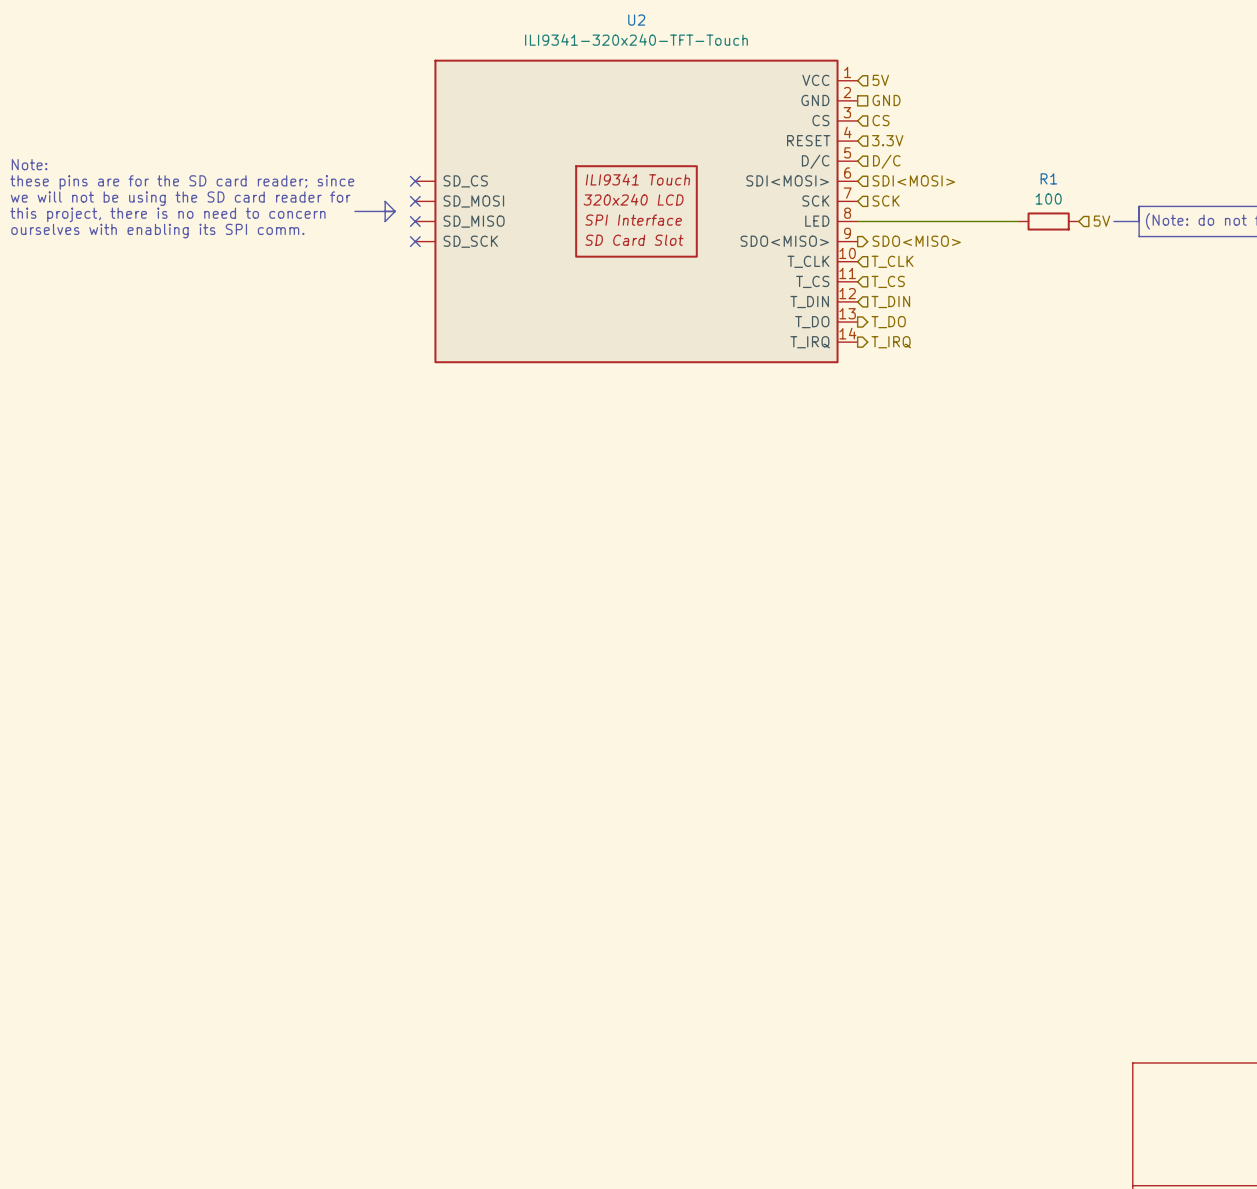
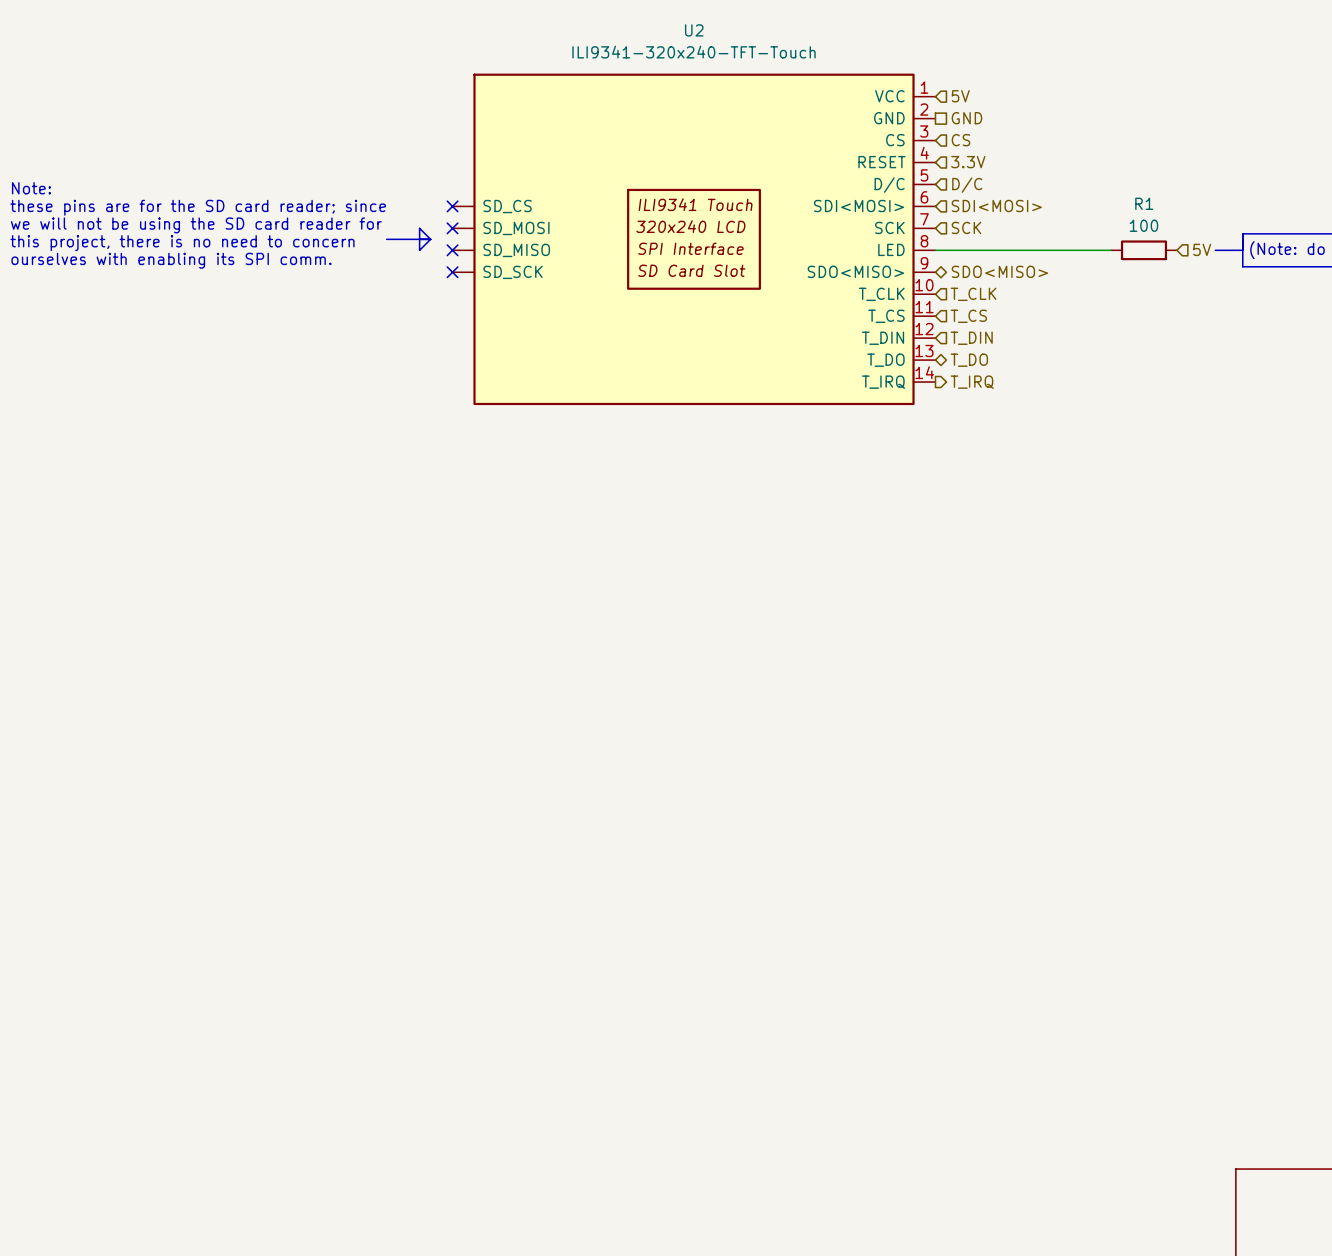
hierarchical label shape: output (916, 241) -> bidirectional (999, 271)
hierarchical label shape: output (888, 322) -> bidirectional (969, 360)

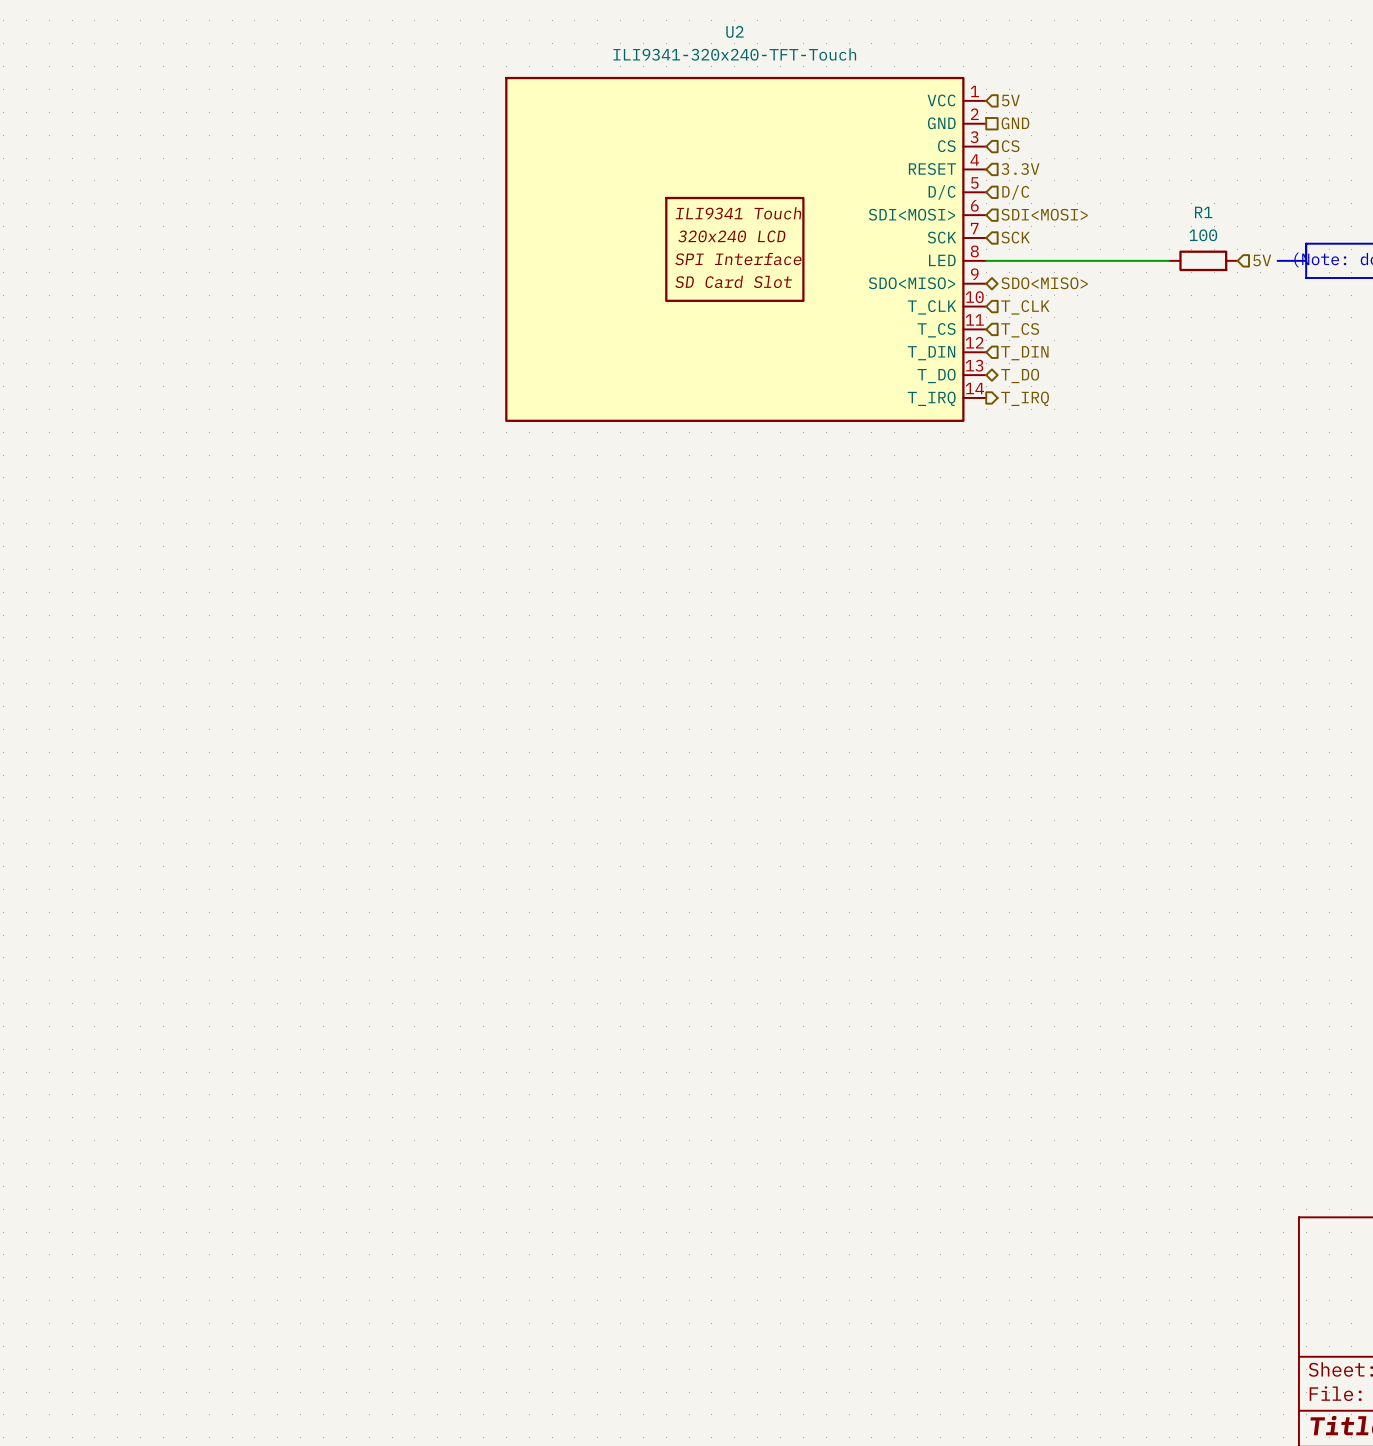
U2 symbol: [452, 73, 936, 406] -> [505, 76, 987, 422]
text: Note: (31, 188) -> none
no-connect mark: (452, 206) -> none
text: these pins are for the SD card reader; since (198, 207) -> none
text: we will not be using the SD card reader for (196, 225) -> none
no-connect mark: (452, 228) -> none
line: (386, 239) (430, 239) -> none
line: (430, 239) (419, 250) (419, 228) (430, 239) -> none
text: this project, there is no need to concern (182, 243) -> none
no-connect mark: (452, 250) -> none
text: ourselves with enabling its SPI comm. (171, 260) -> none
no-connect mark: (452, 272) -> none

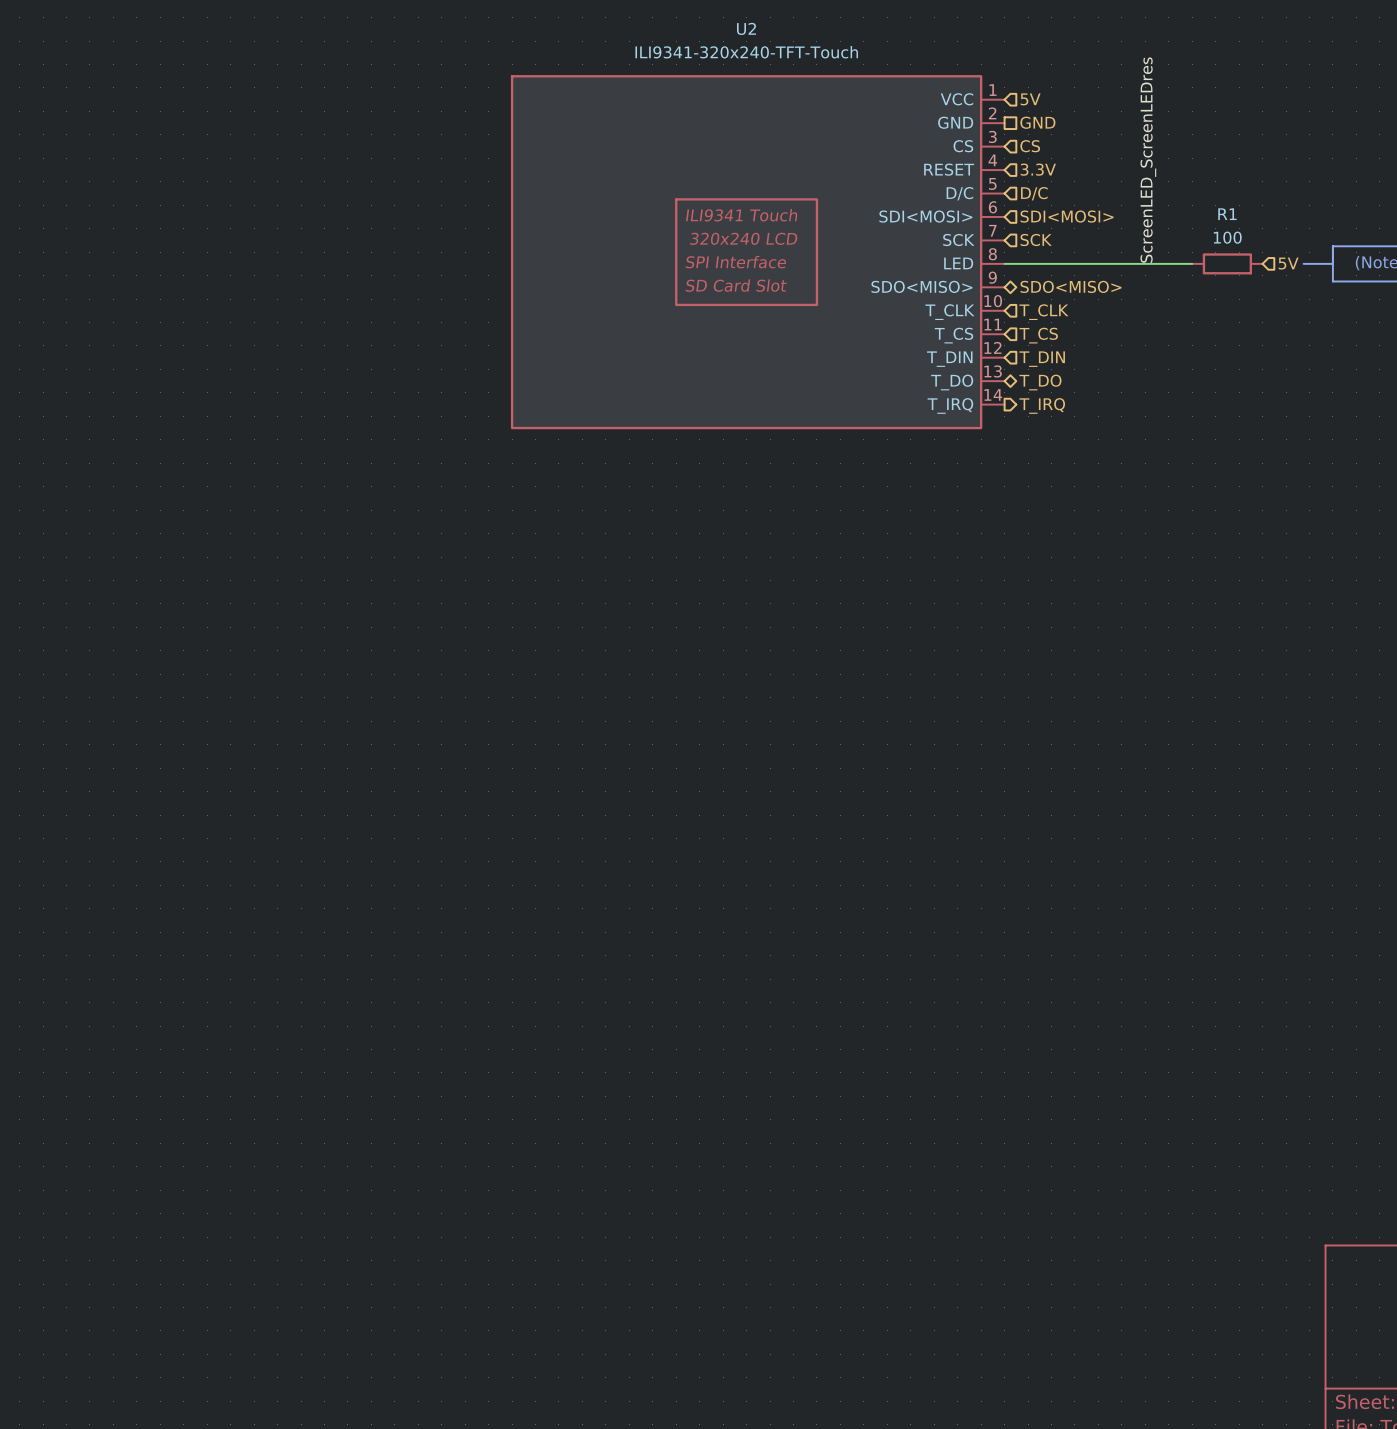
label: none -> ScreenLED_ScreenLEDres (1148, 160)

